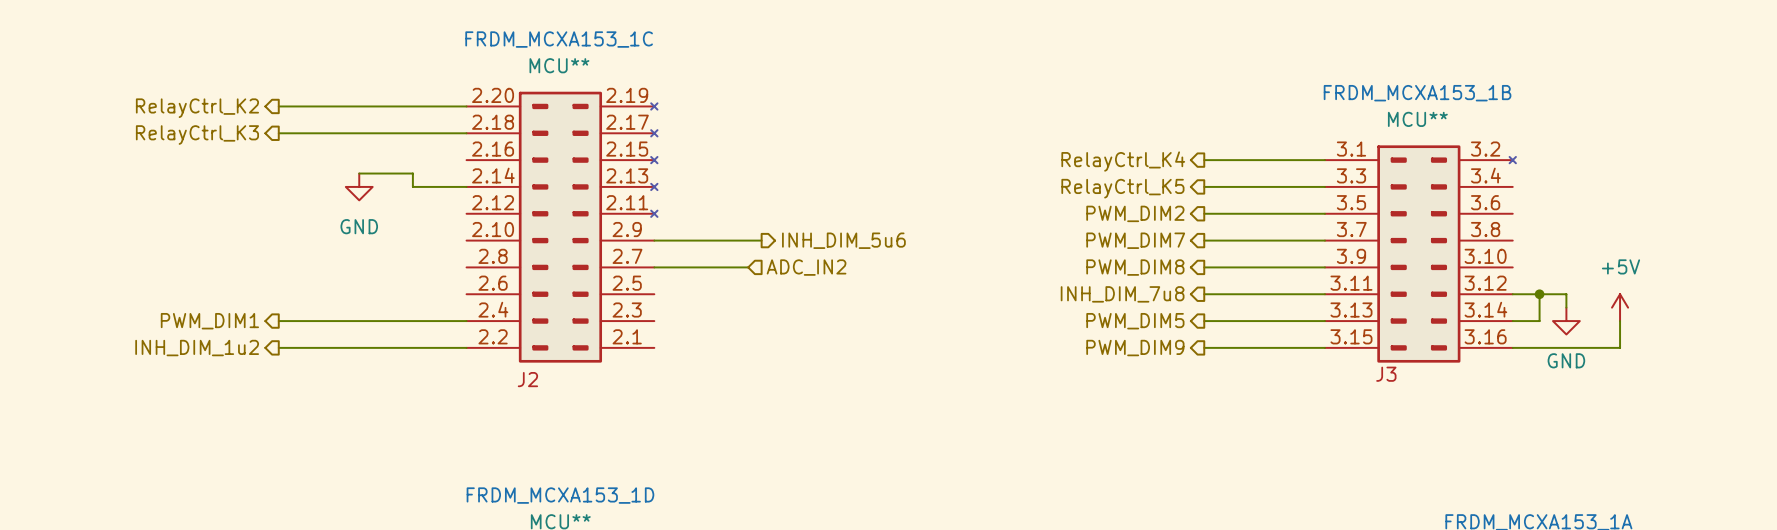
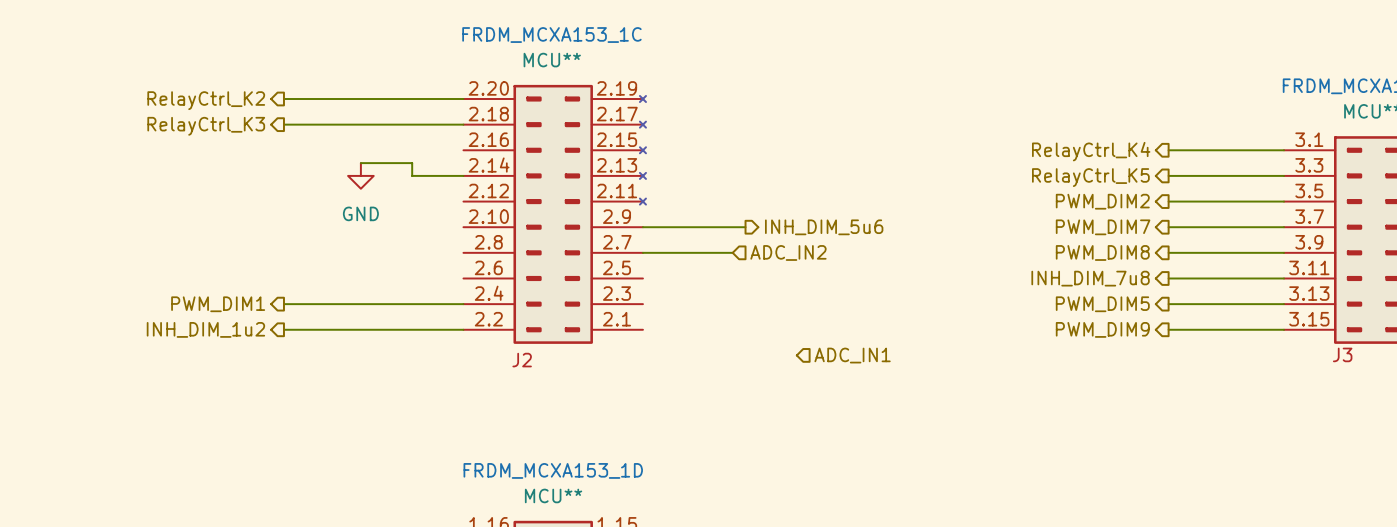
hierarchical label: none -> ADC_IN1 (852, 355)

